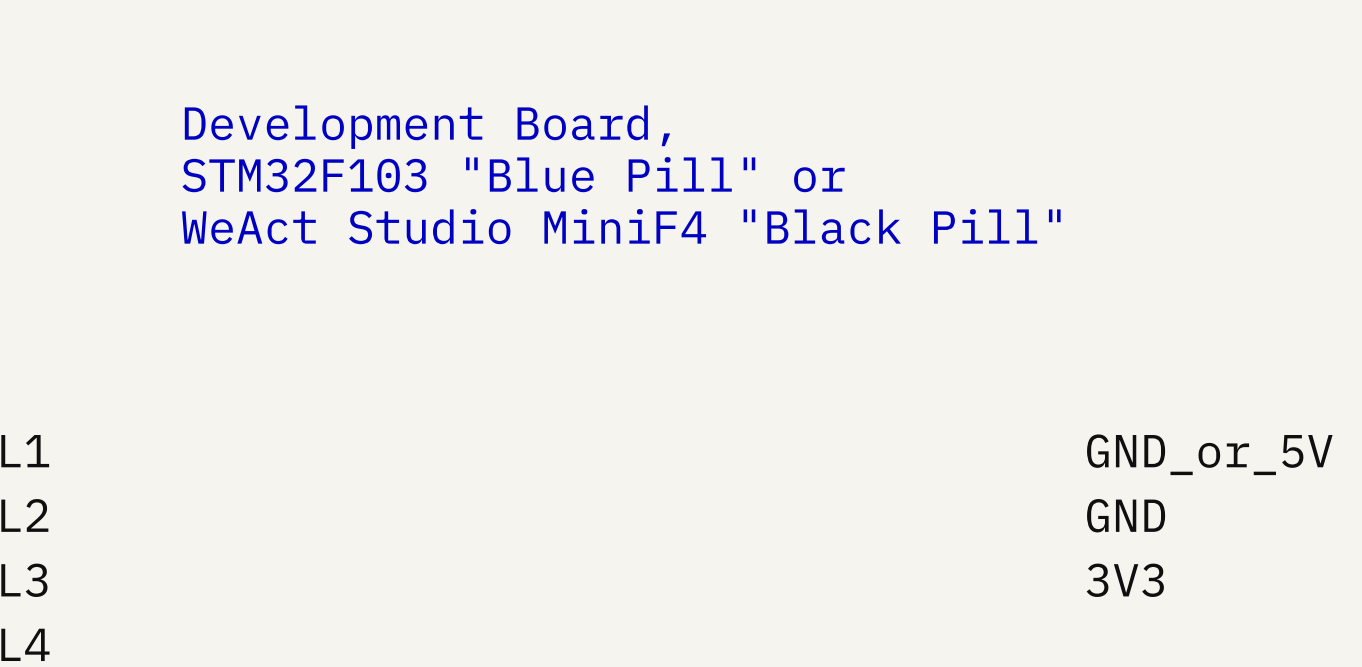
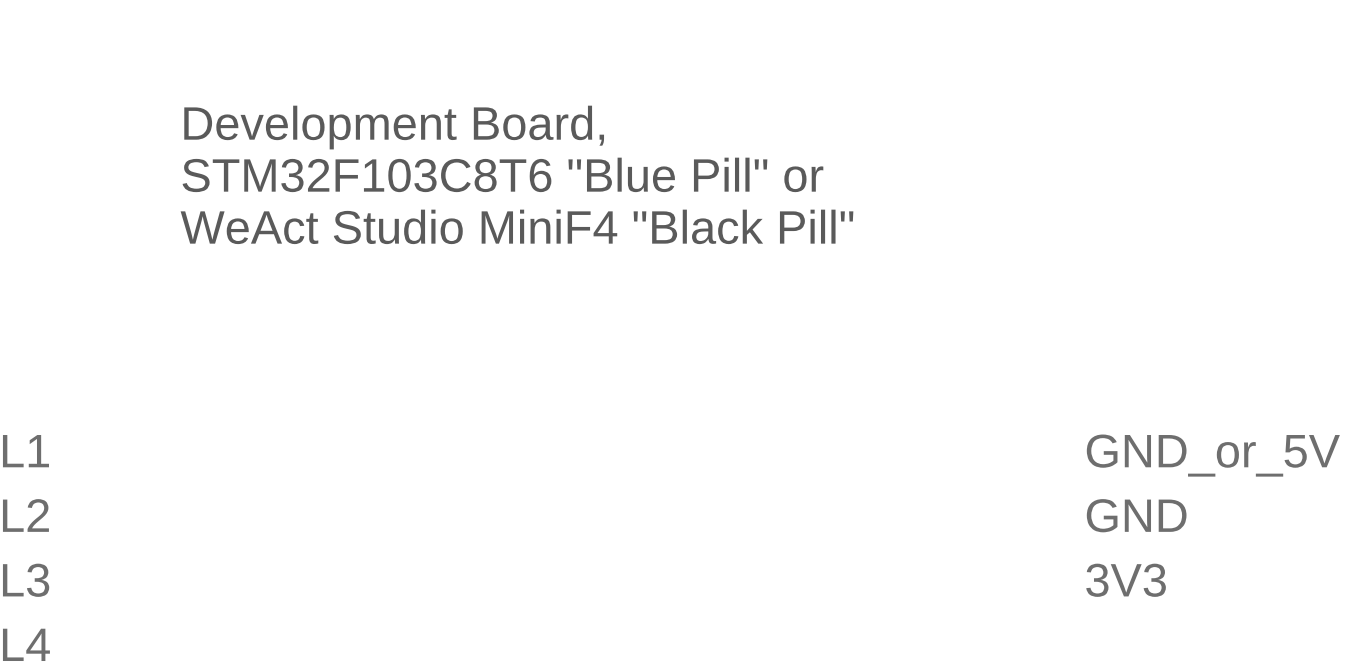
text: STM32F103 "Blue Pill" or (513, 174) -> STM32F103C8T6 "Blue Pill" or (502, 174)

